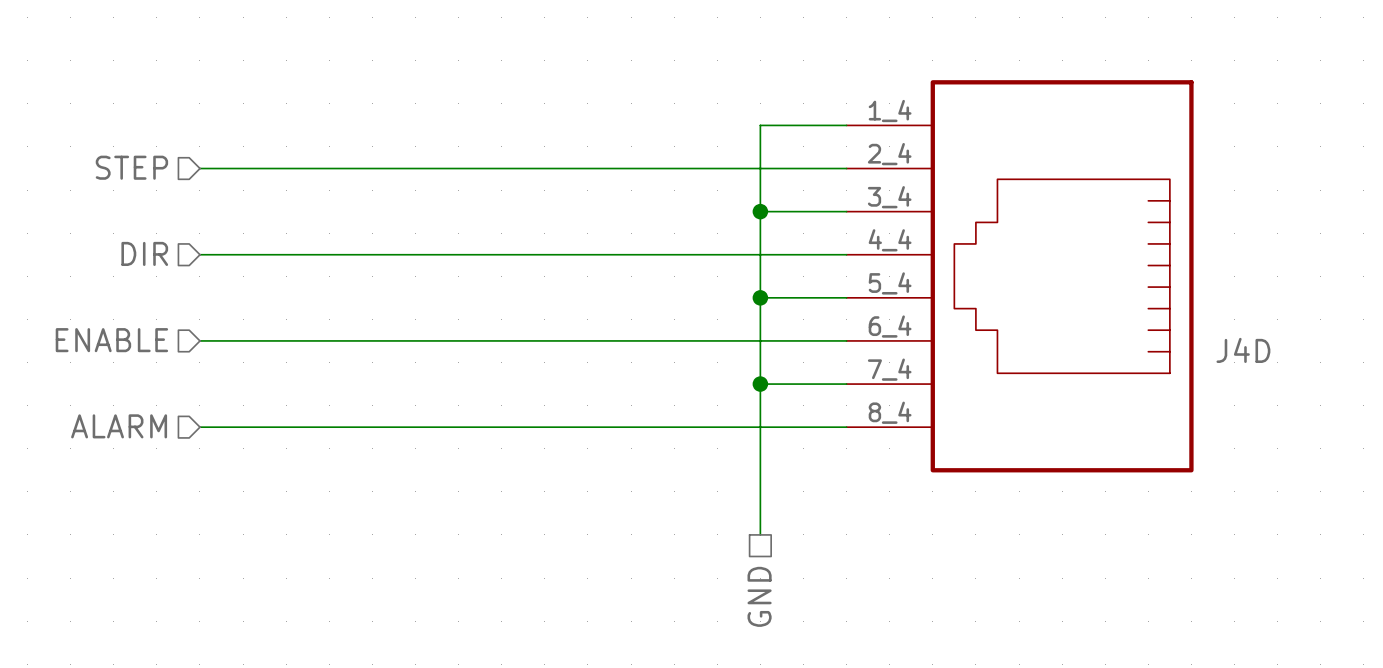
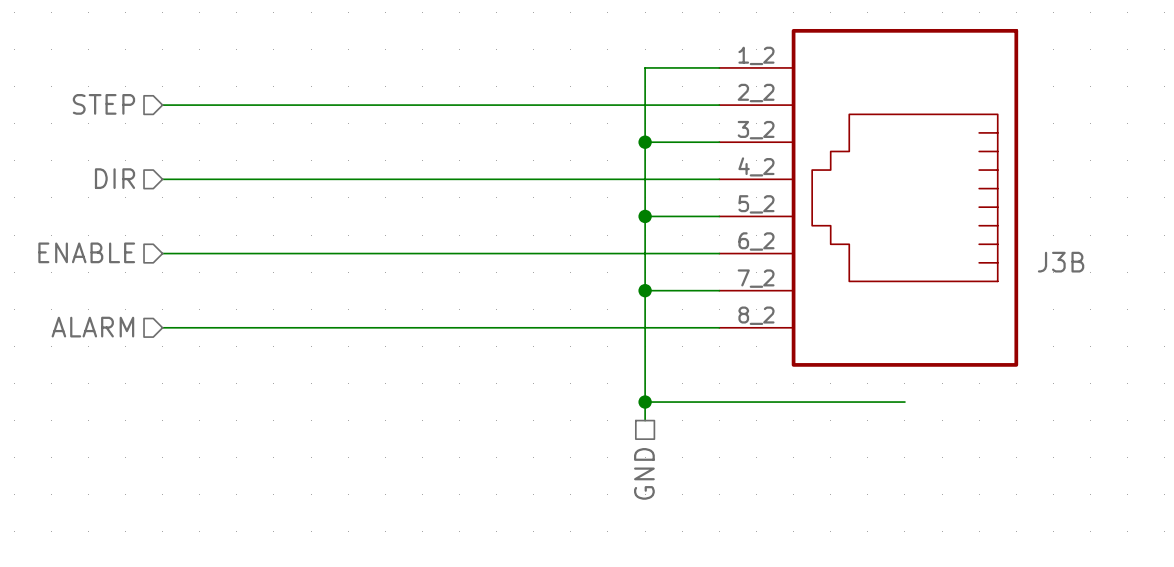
J4D pin number: 1_4 (890, 111) -> 1_2 (756, 55)
J4D pin number: 2_4 (889, 154) -> 2_2 (756, 93)
J4D pin number: 3_4 (889, 197) -> 3_2 (756, 130)
J4D pin number: 4_4 (890, 240) -> 4_2 (756, 166)
J4D pin number: 5_4 (890, 283) -> 5_2 (756, 204)
J4D pin number: 6_4 (890, 326) -> 6_2 (756, 241)
J4D name: J4D (1243, 350) -> J3B (1061, 262)
J4D pin number: 7_4 (889, 369) -> 7_2 (756, 278)
J4D pin number: 8_4 (890, 412) -> 8_2 (756, 315)
wire: none -> (645, 402) (904, 402)
junction: none -> (645, 402)

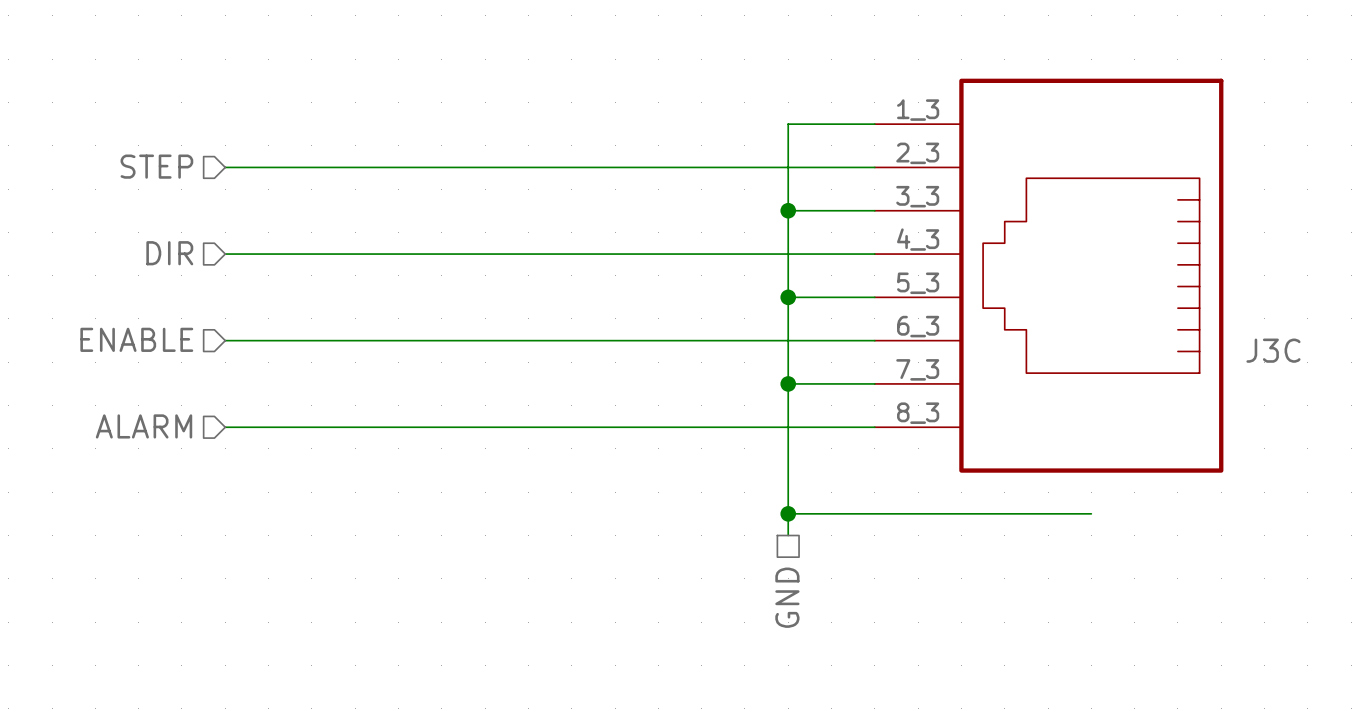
J3B pin number: 1_2 (756, 55) -> 1_3 (918, 110)
J3B pin number: 2_2 (756, 93) -> 2_3 (917, 153)
J3B pin number: 3_2 (756, 130) -> 3_3 (917, 196)
J3B pin number: 4_2 (756, 166) -> 4_3 (918, 239)
J3B pin number: 5_2 (756, 204) -> 5_3 (918, 283)
J3B pin number: 6_2 (756, 241) -> 6_3 (918, 326)
J3B name: J3B (1061, 262) -> J3C (1273, 350)
J3B pin number: 7_2 (756, 278) -> 7_3 (917, 369)
J3B pin number: 8_2 (756, 315) -> 8_3 (918, 413)

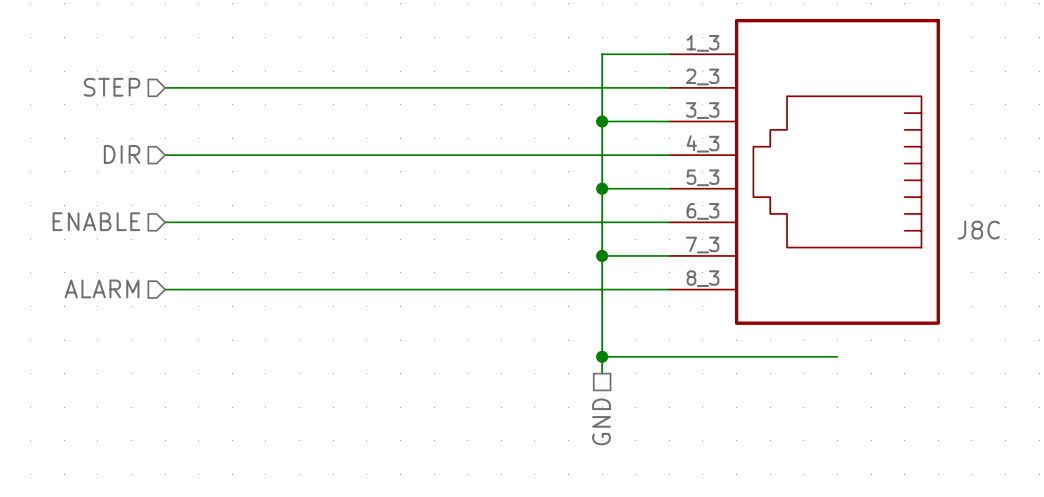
J3C name: J3C (1273, 350) -> J8C (978, 230)

